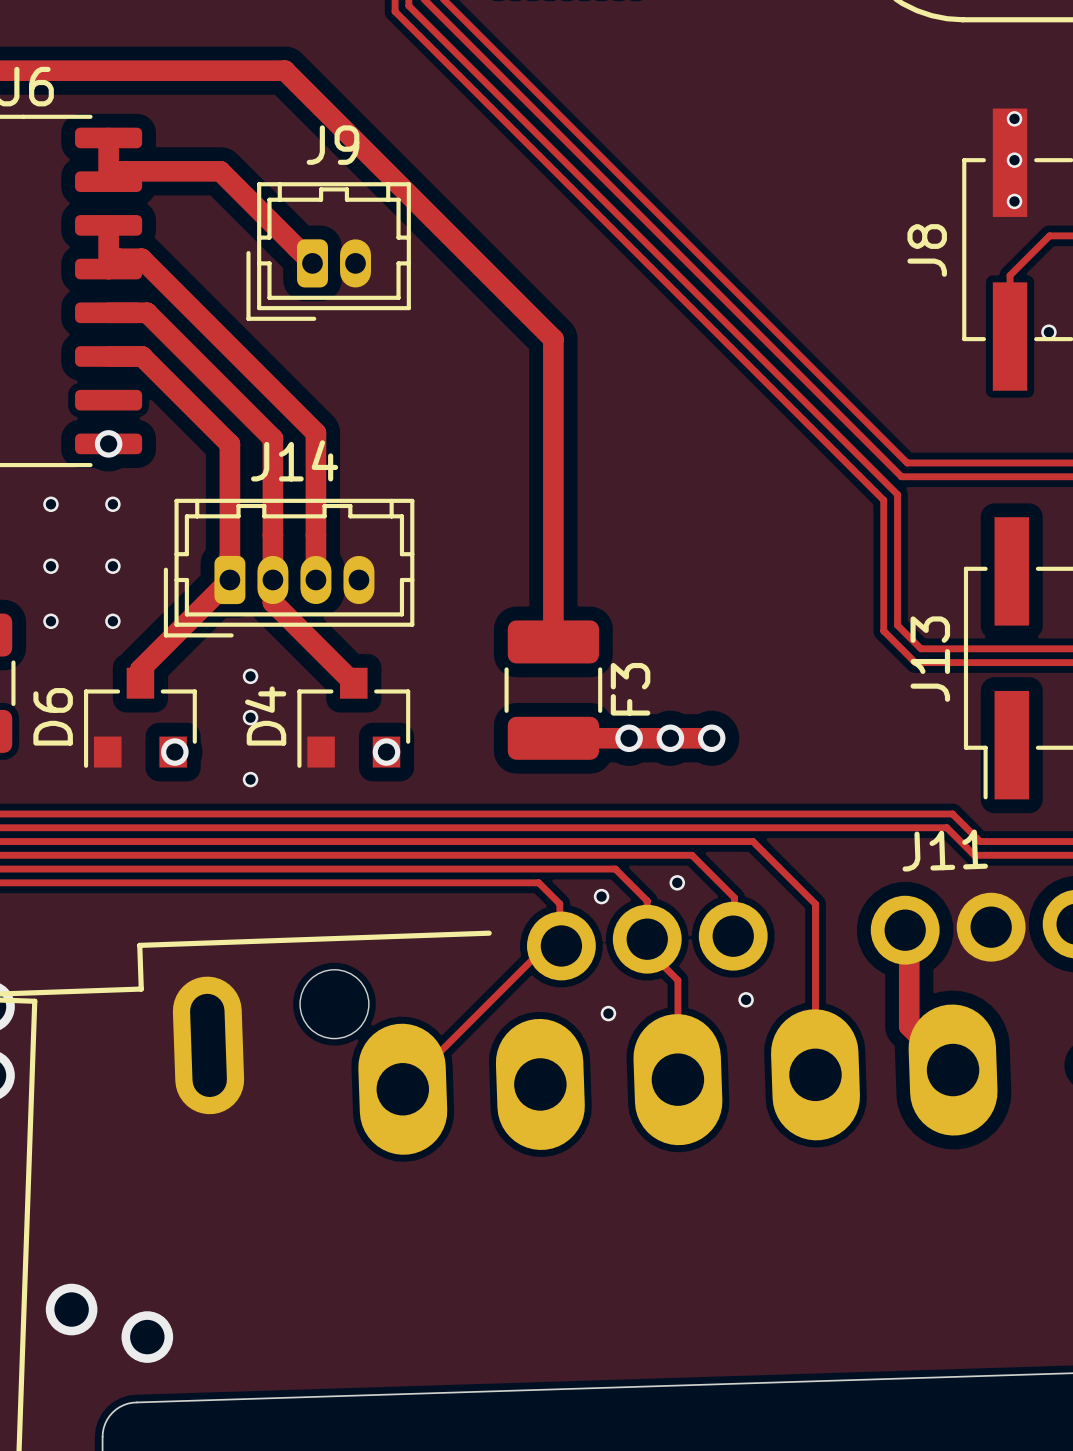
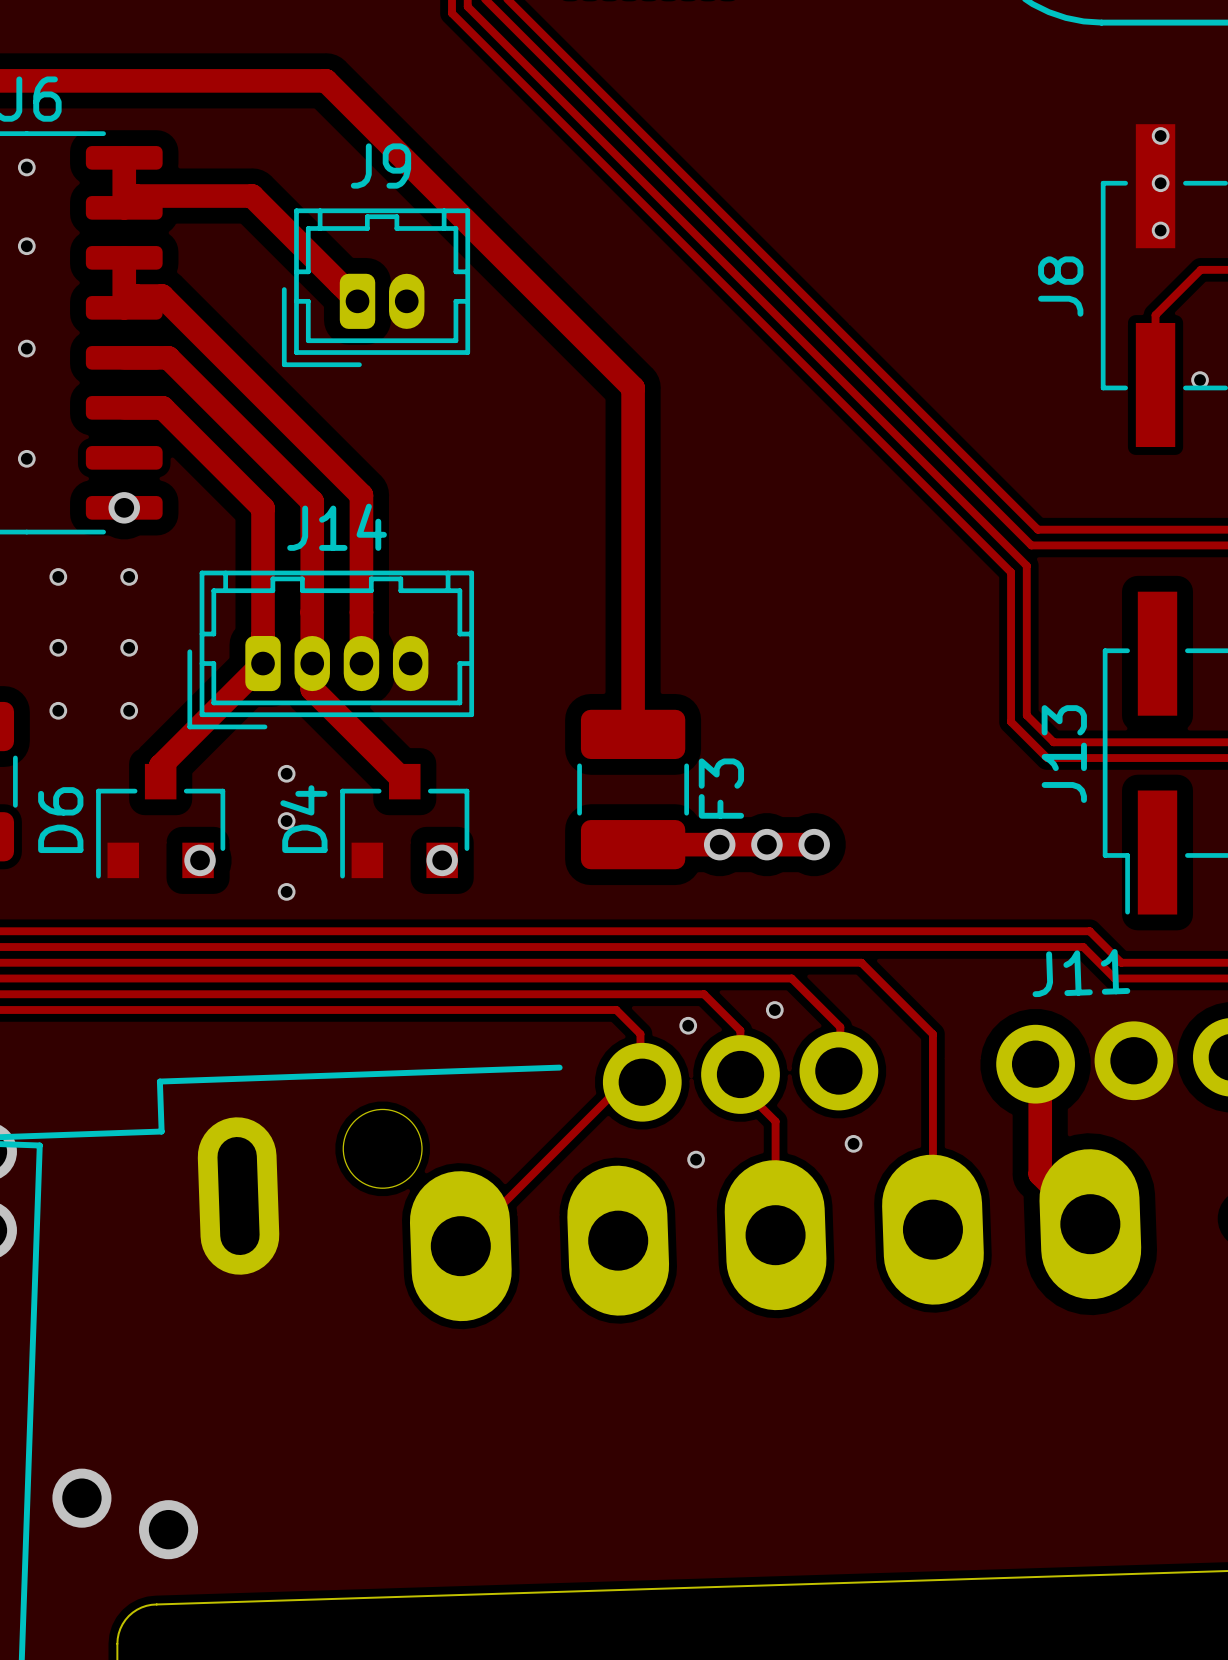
via: none -> (26, 167)
via: none -> (26, 246)
via: none -> (26, 348)
via: none -> (26, 458)

